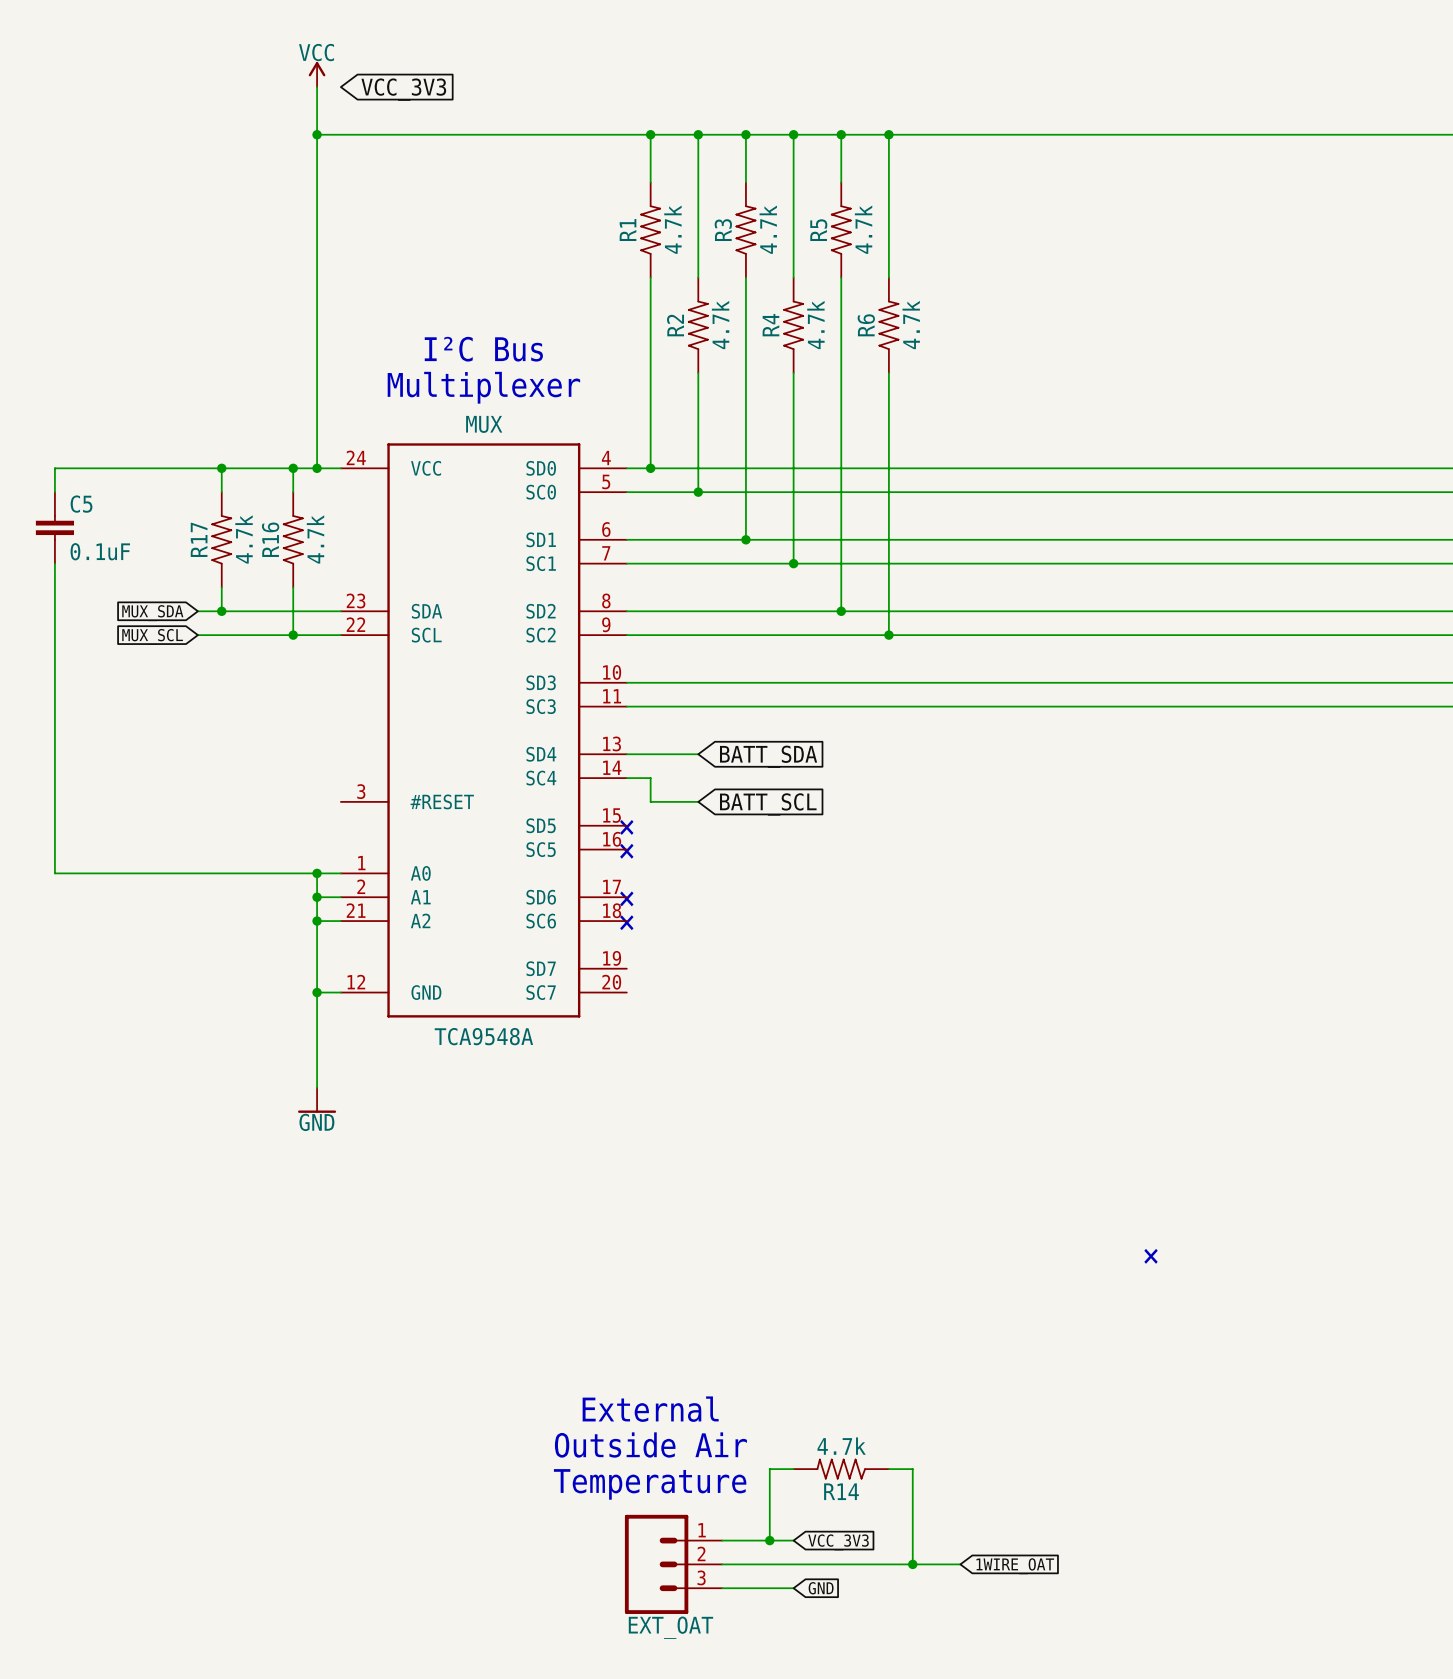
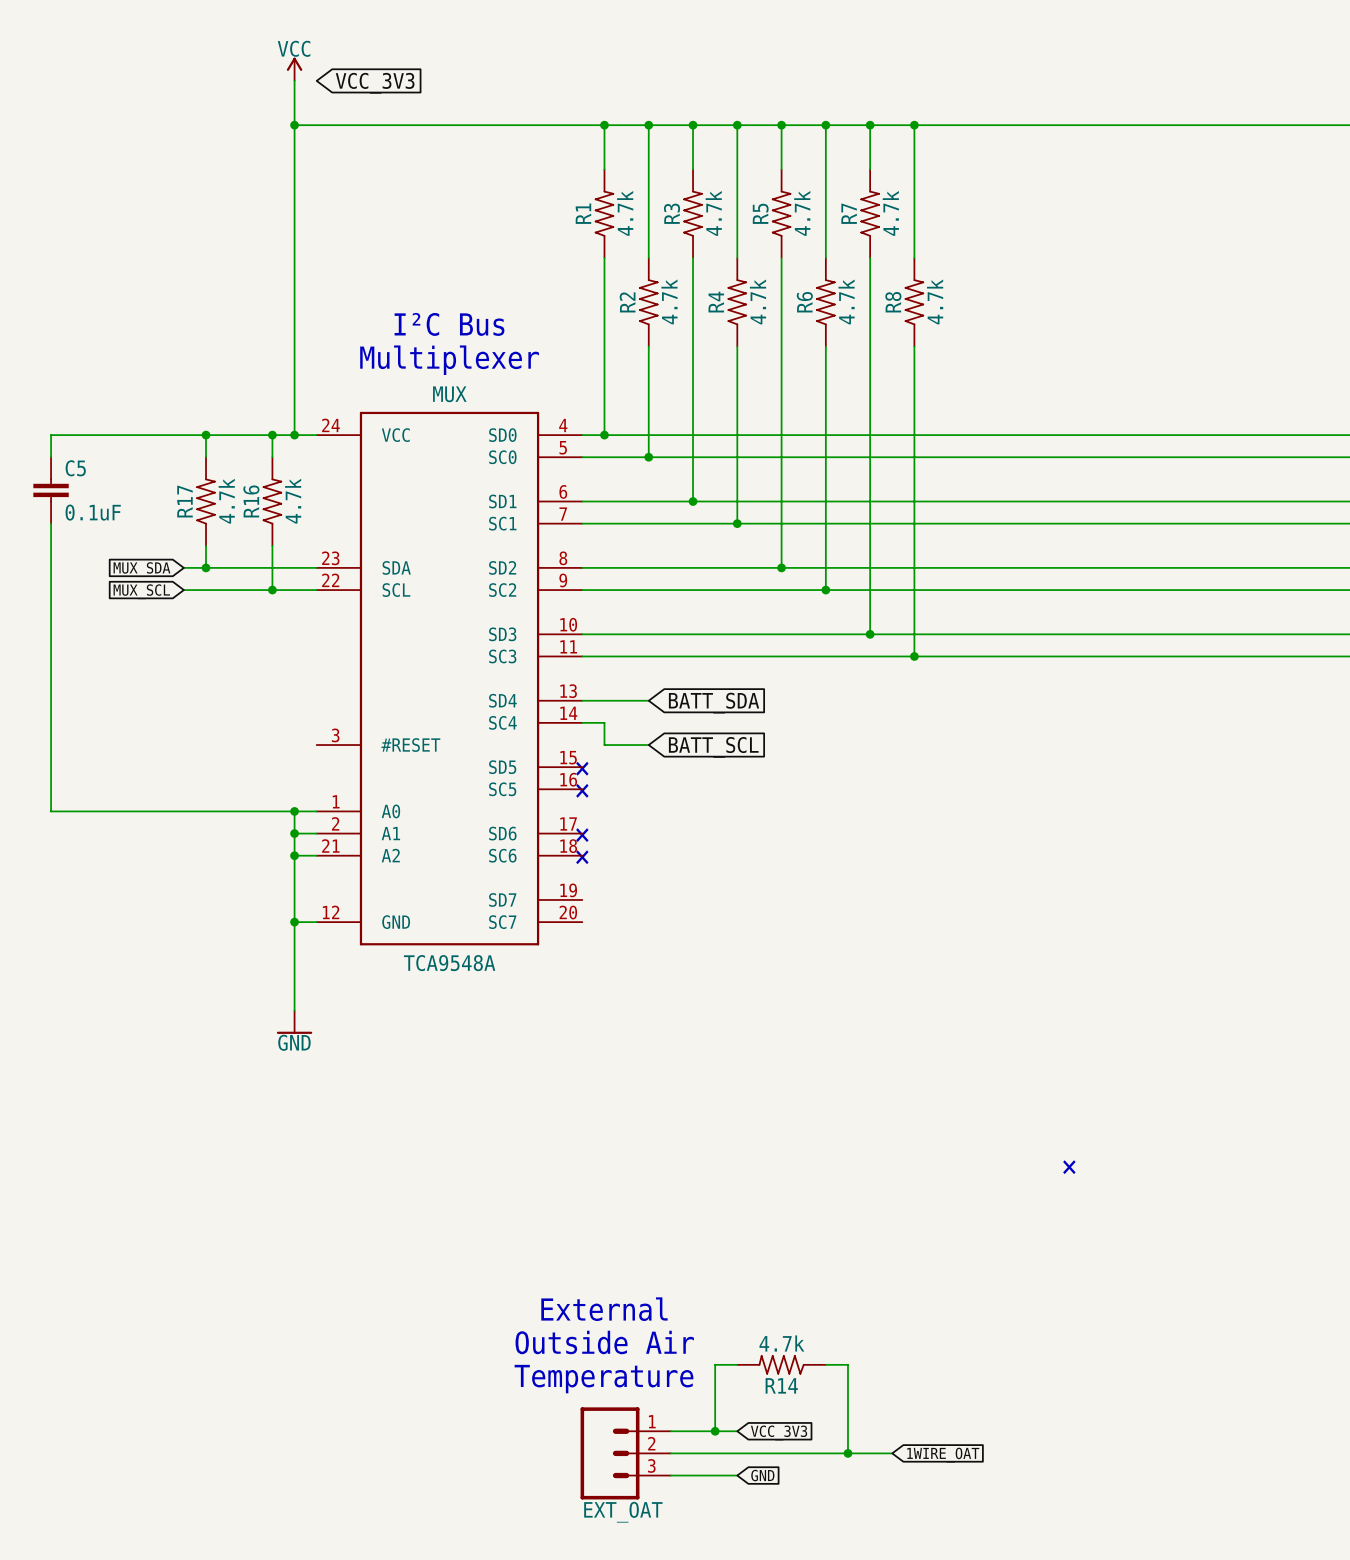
wire: none -> (870, 125) (870, 169)
junction: none -> (870, 125)
wire: none -> (914, 125) (914, 258)
junction: none -> (914, 125)
R7: none -> 4.7k (870, 213)
wire: none -> (870, 258) (870, 634)
R8: none -> 4.7k (914, 302)
wire: none -> (914, 346) (914, 656)
junction: none -> (870, 634)
junction: none -> (914, 656)

